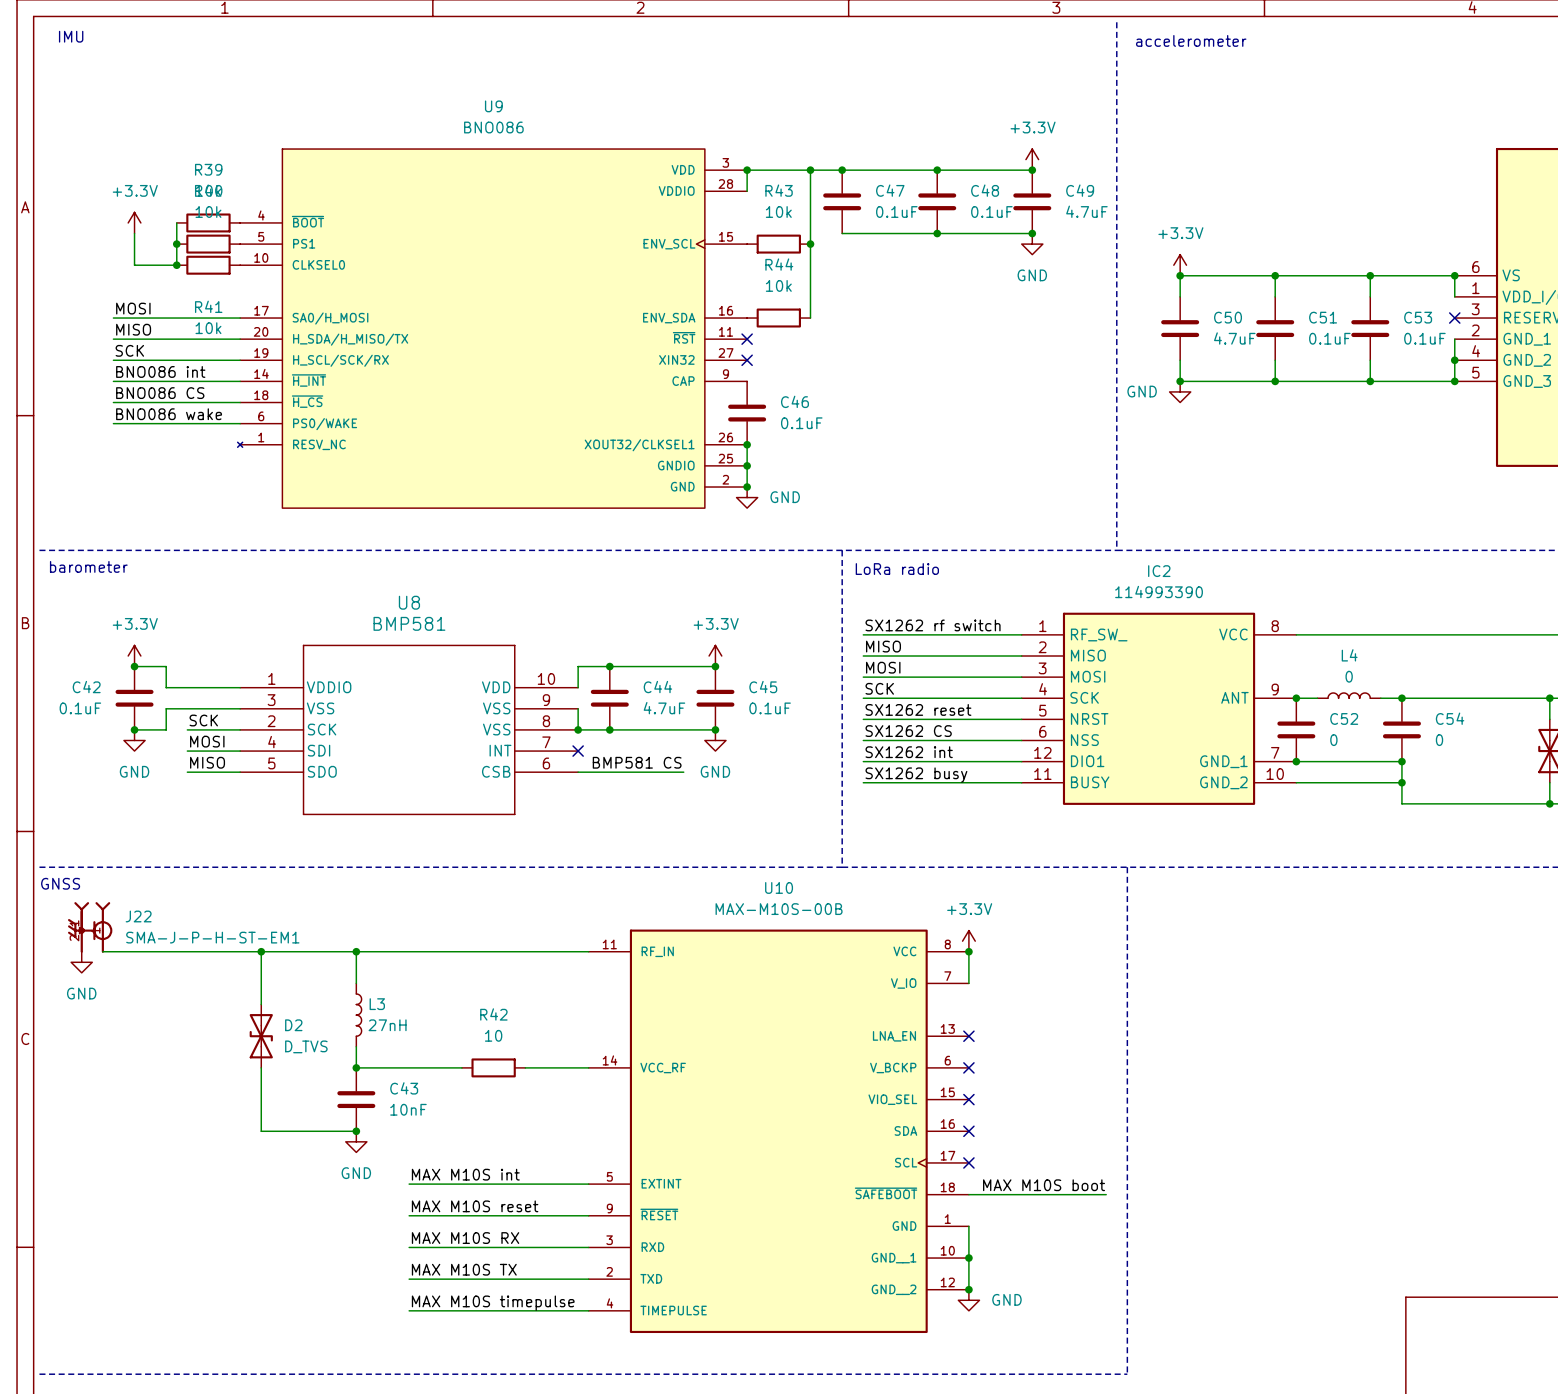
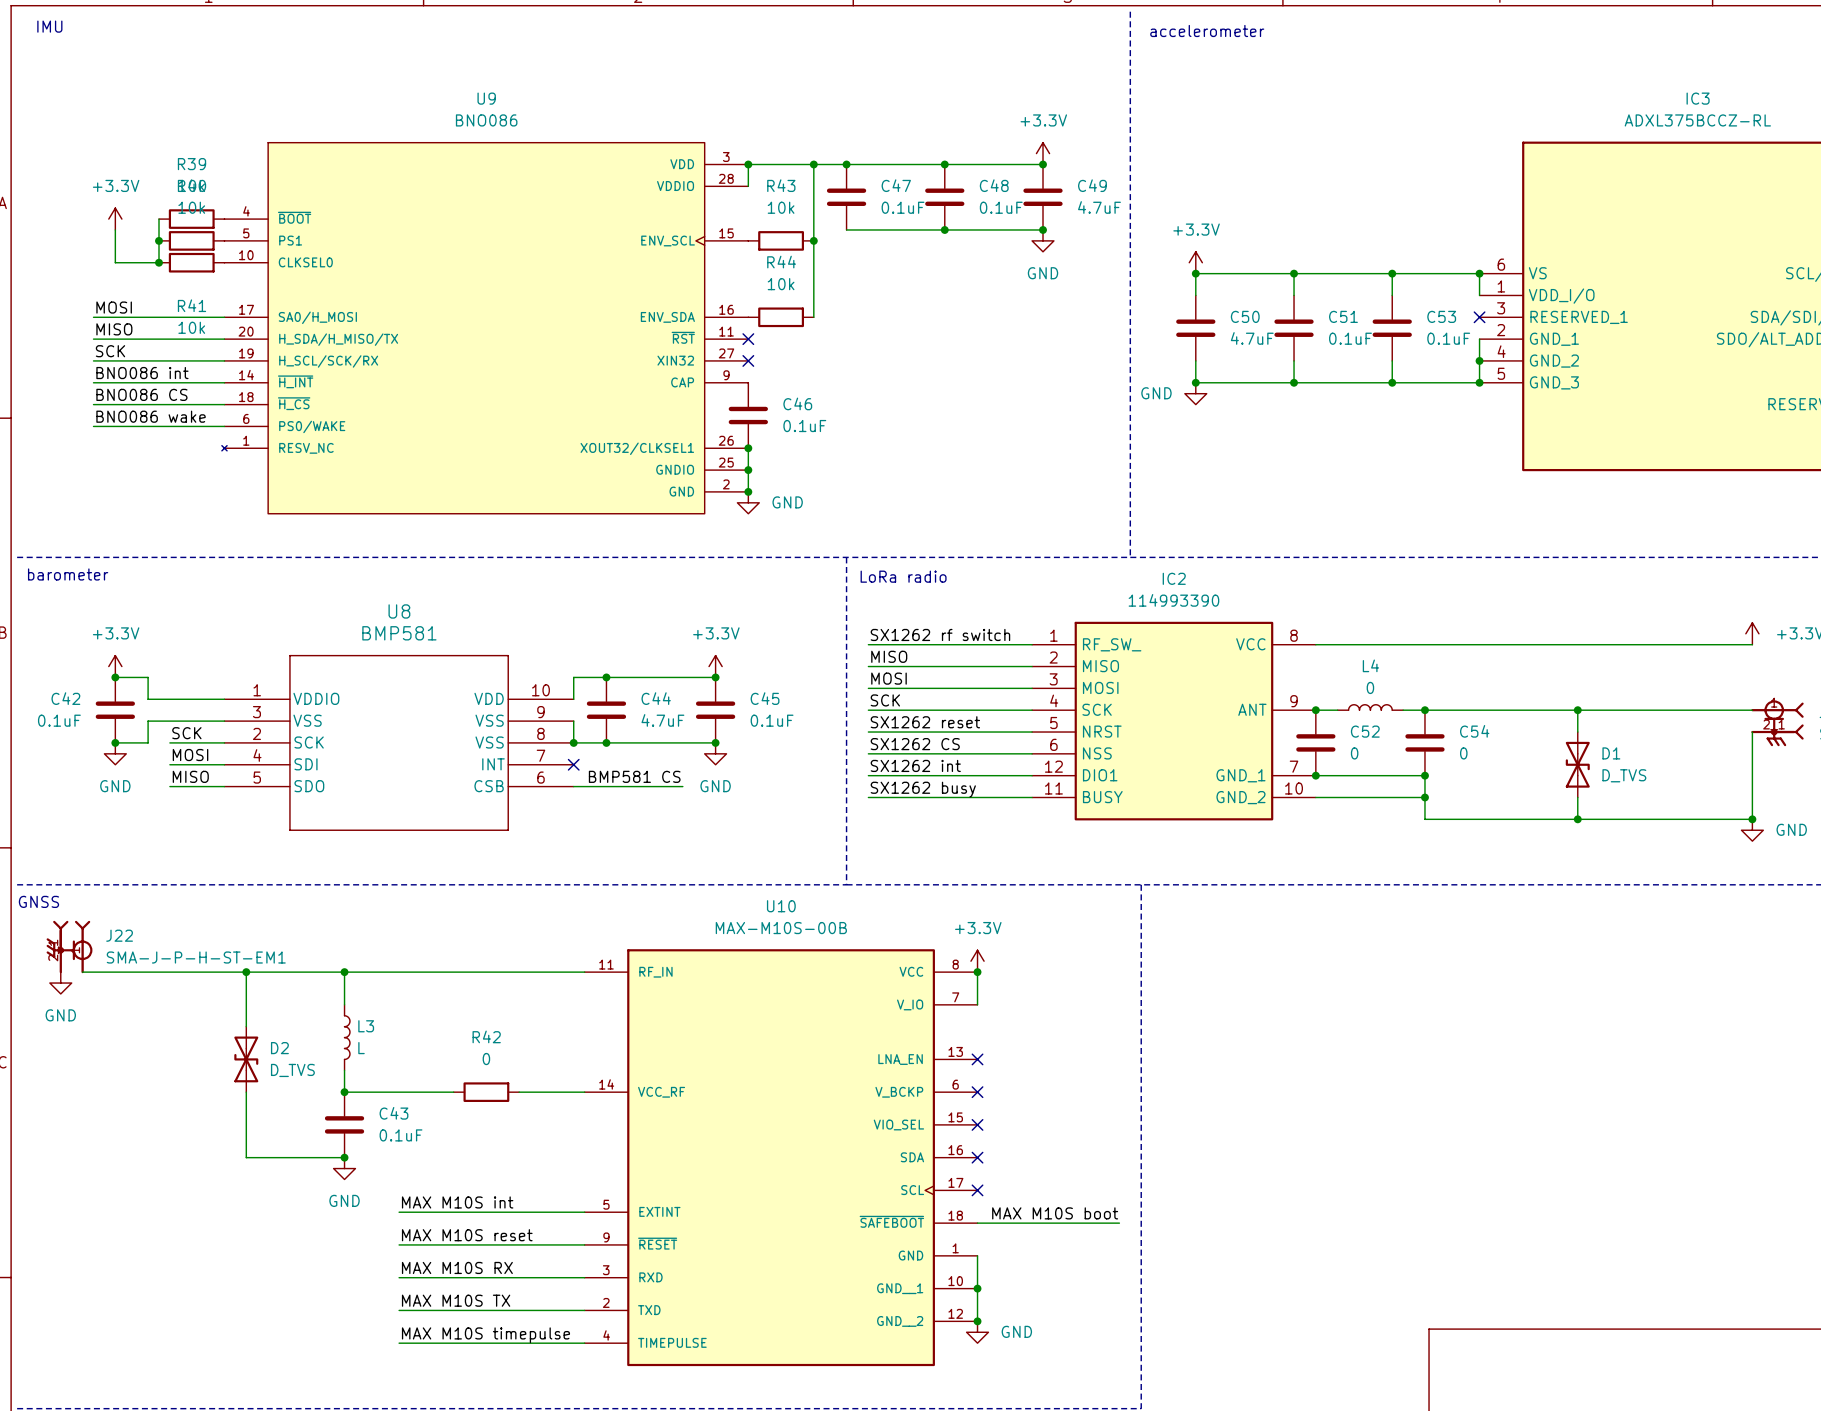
L3 value: 27nH (387, 1025) -> L (361, 1048)
R42 value: 10 (493, 1035) -> 0 (486, 1059)
C43 value: 10nF (408, 1109) -> 0.1uF (401, 1135)

